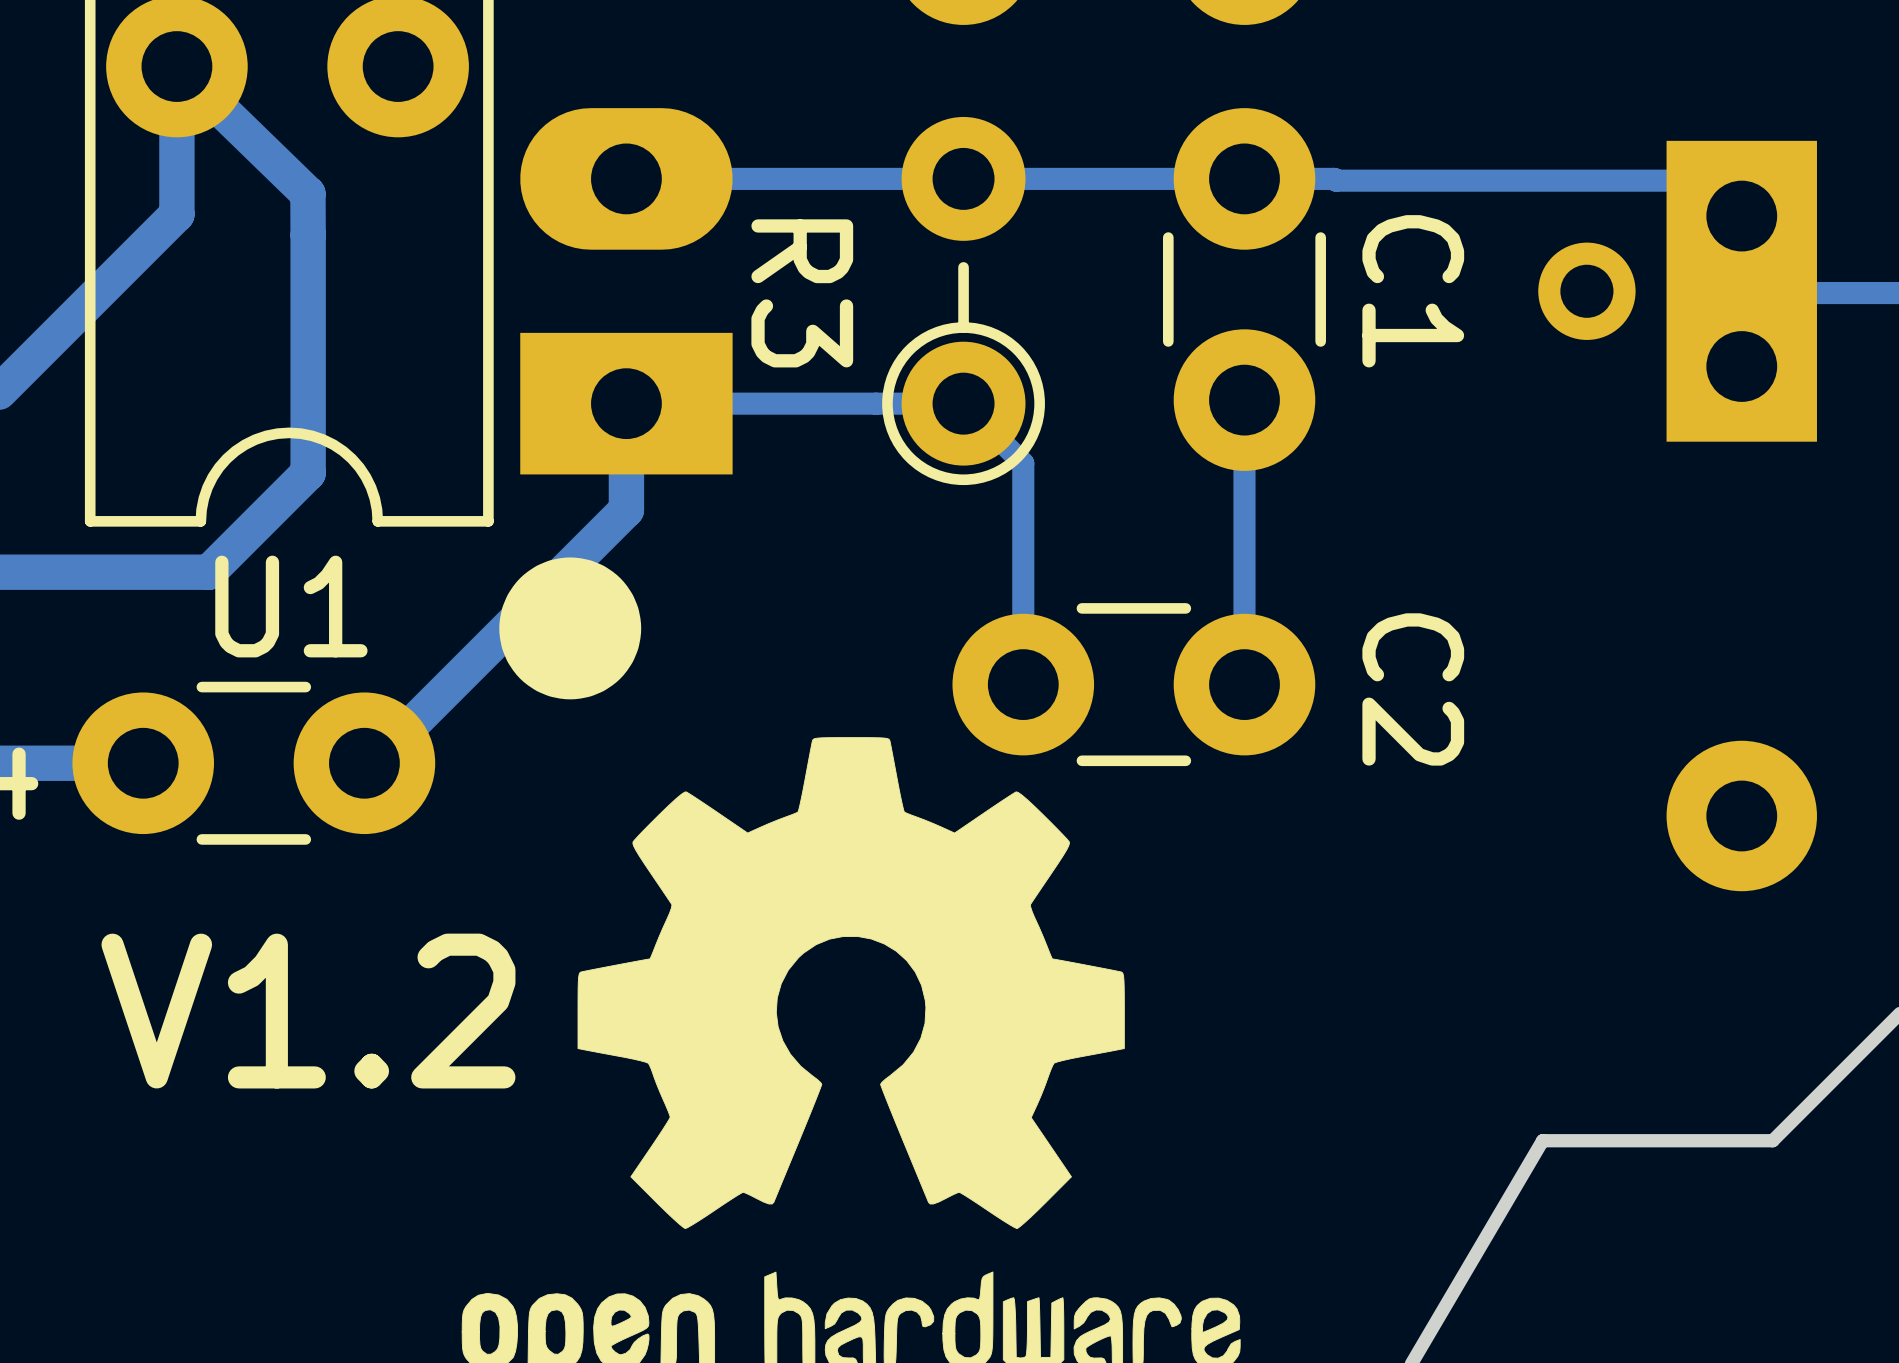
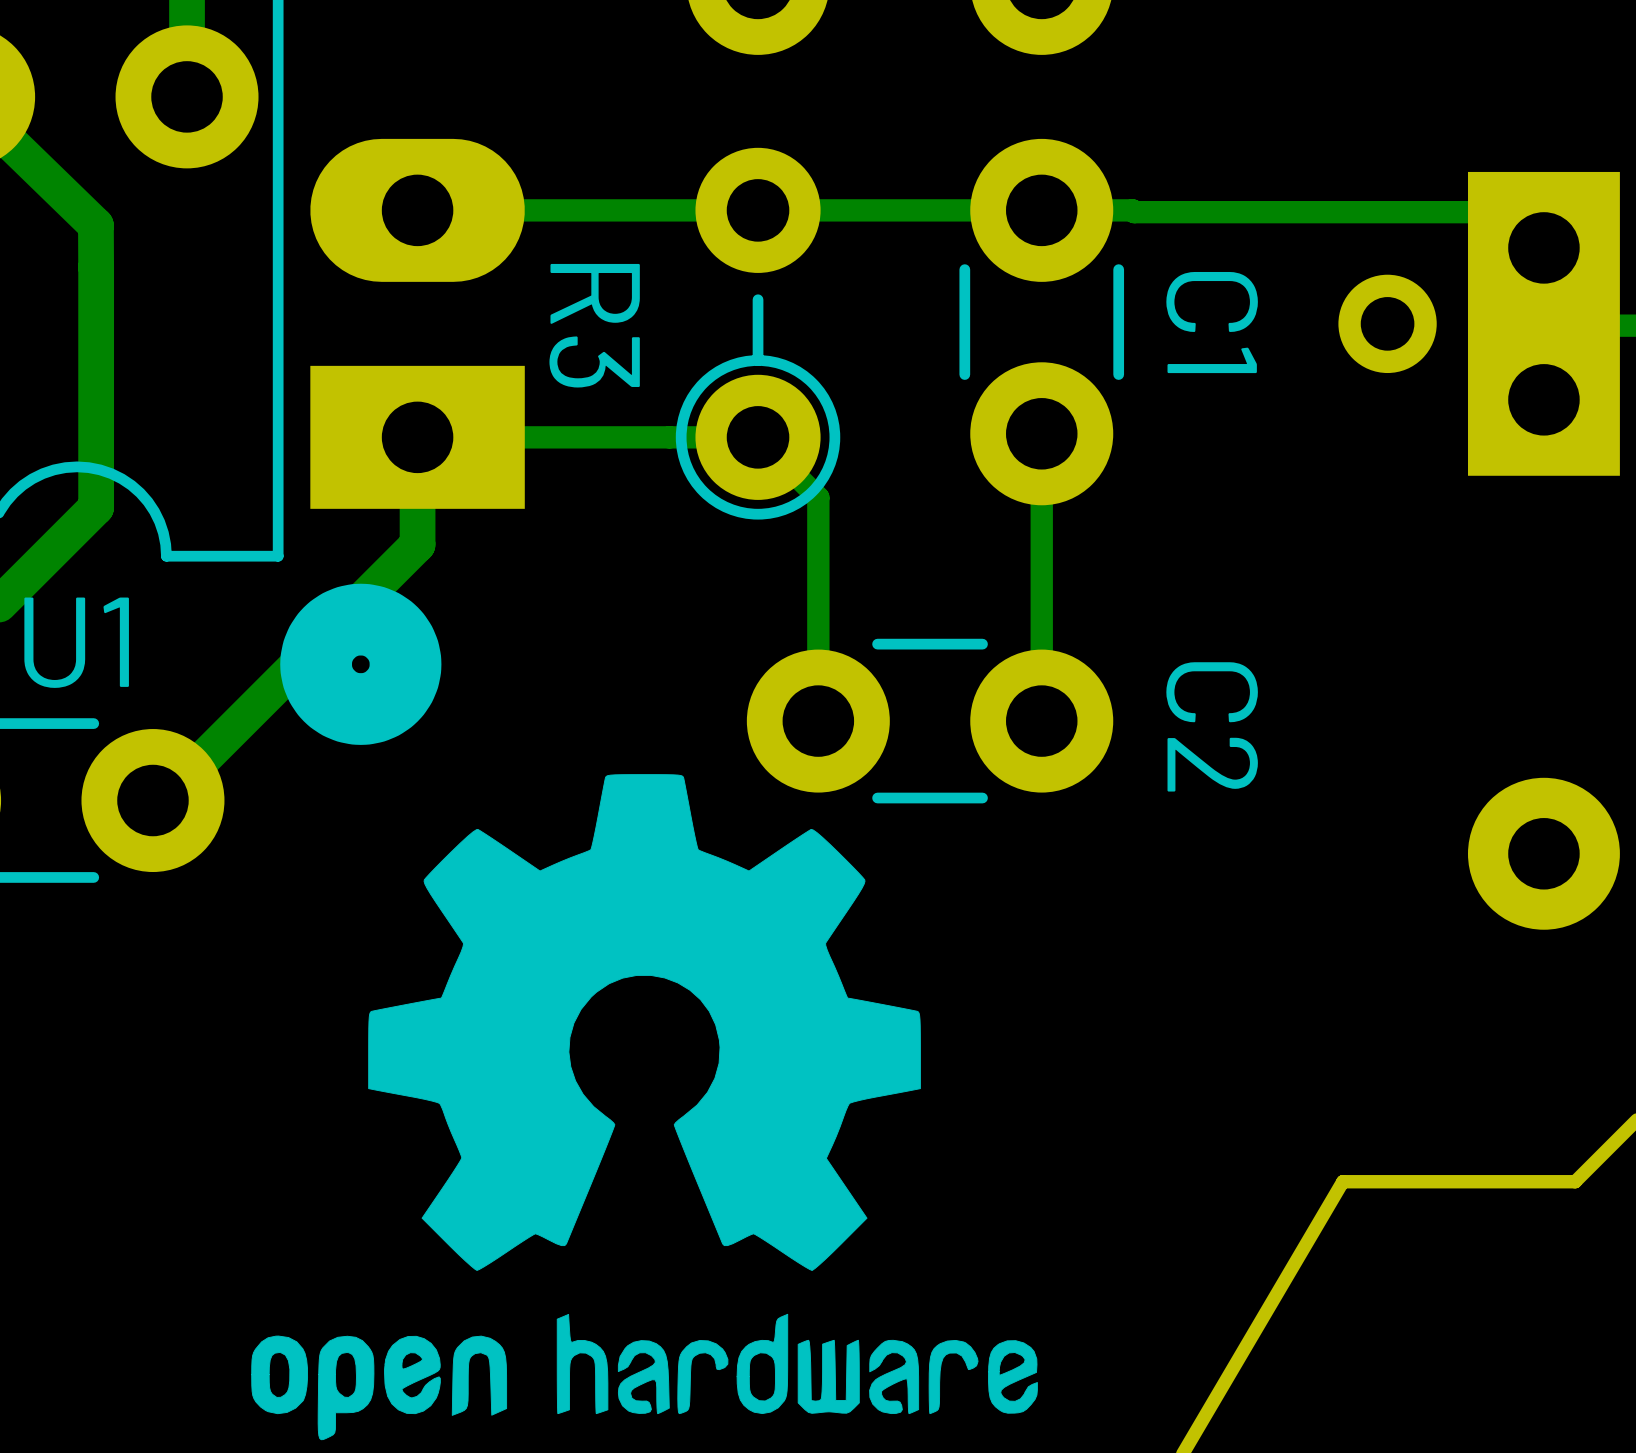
drawing shape: [499, 557, 642, 700] -> [280, 583, 442, 745]

